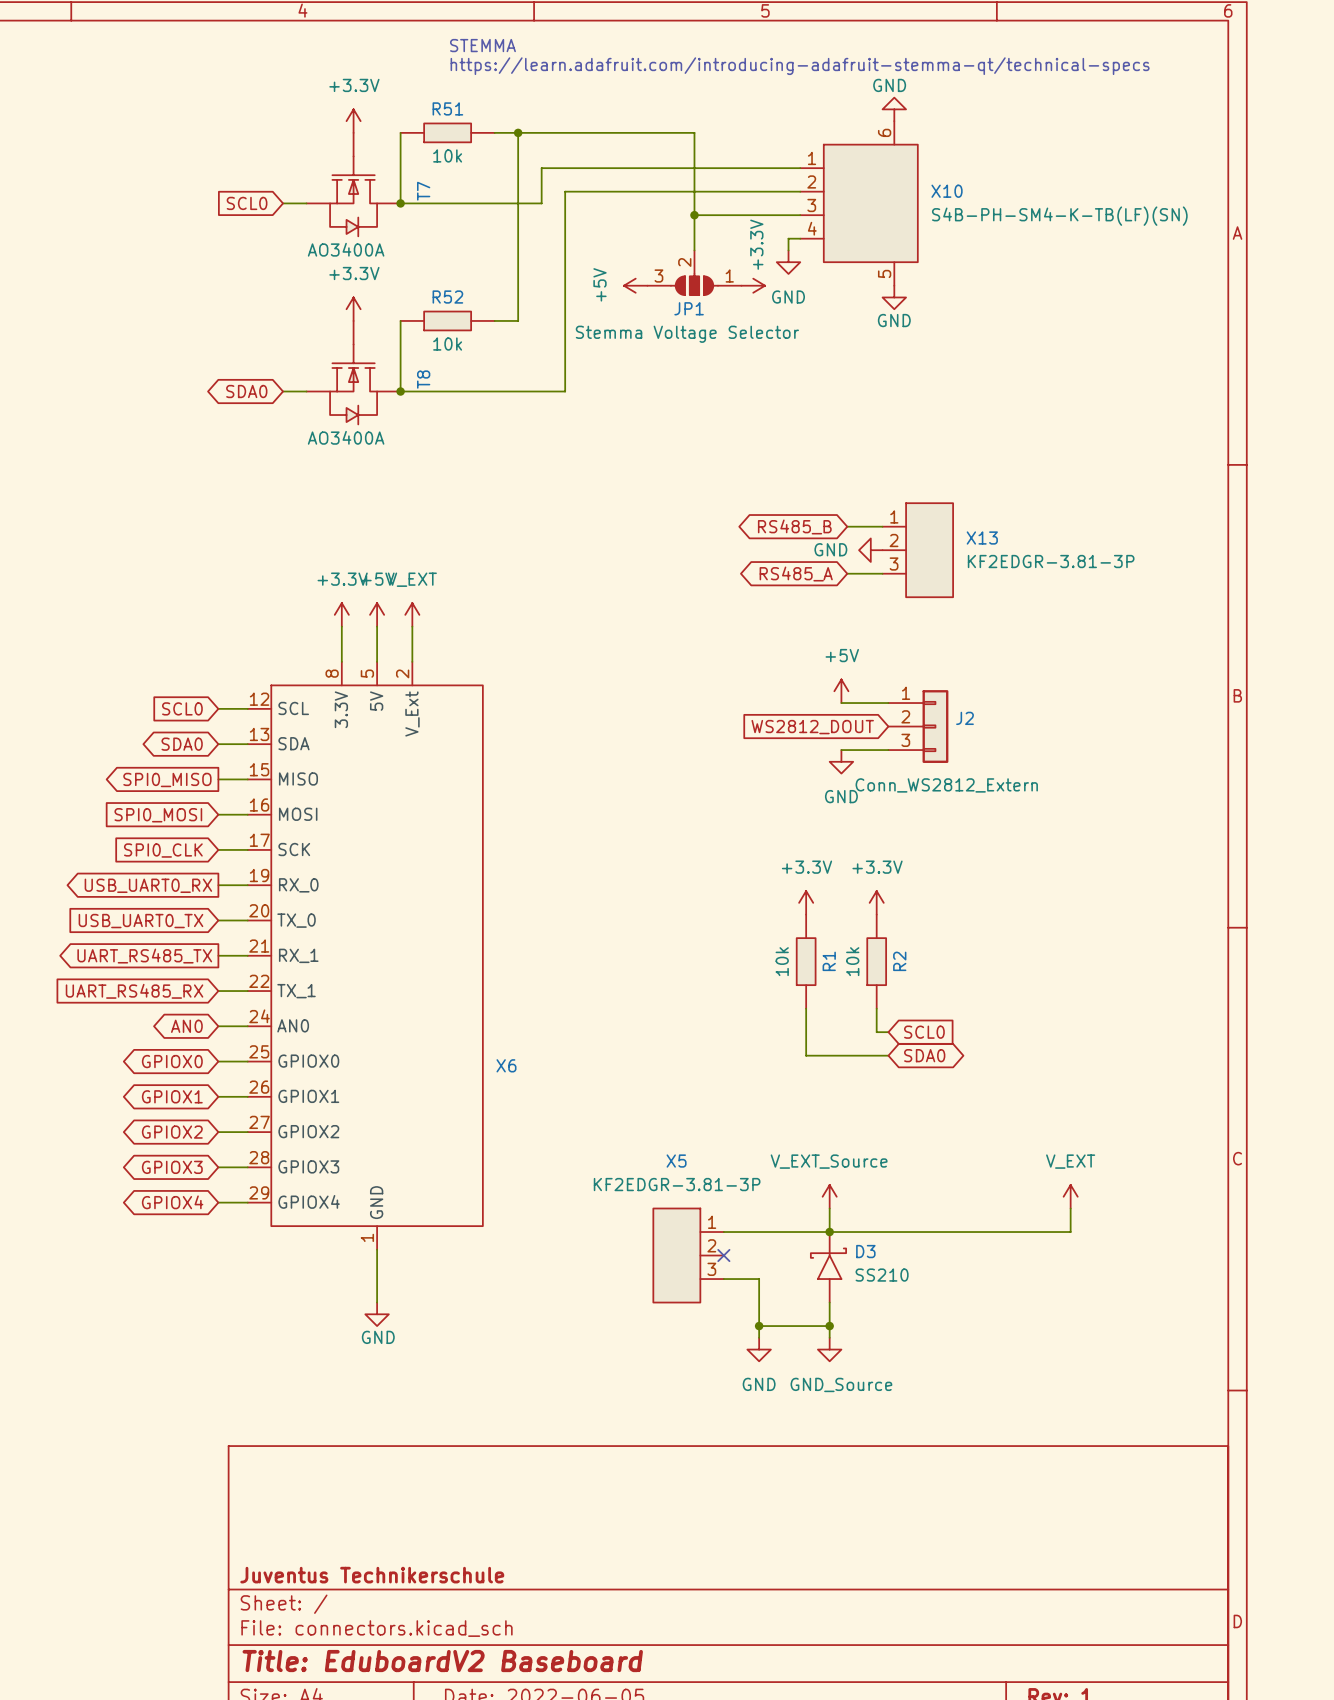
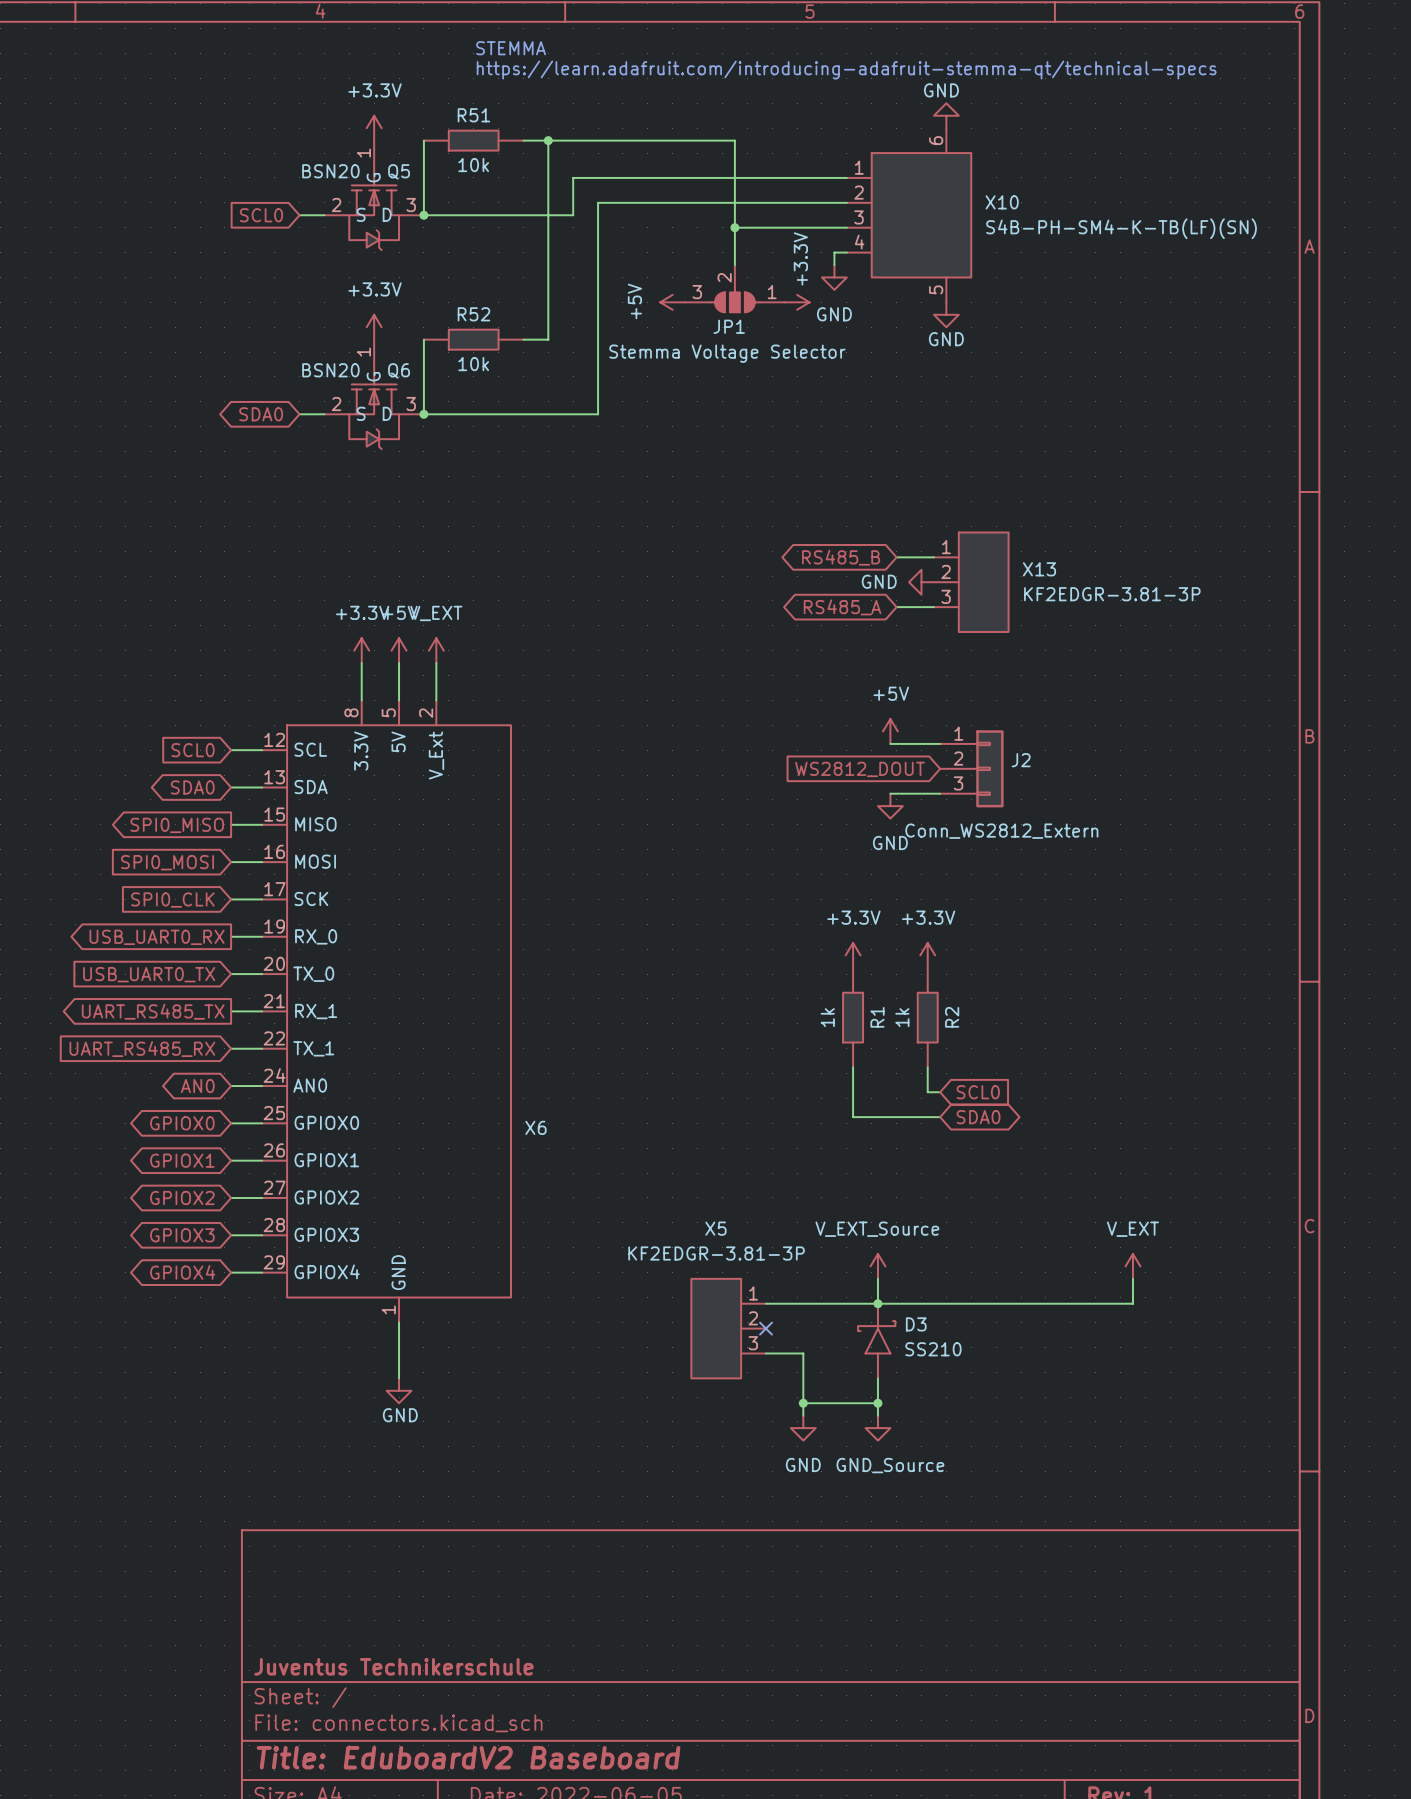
T7: AO3400A (353, 184) -> none
Q5: none -> BSN20 (374, 195)
T8: AO3400A (353, 372) -> none
Q6: none -> BSN20 (374, 394)
R1 value: 10k (782, 961) -> 1k (827, 1017)
R2 value: 10k (852, 961) -> 1k (902, 1017)

